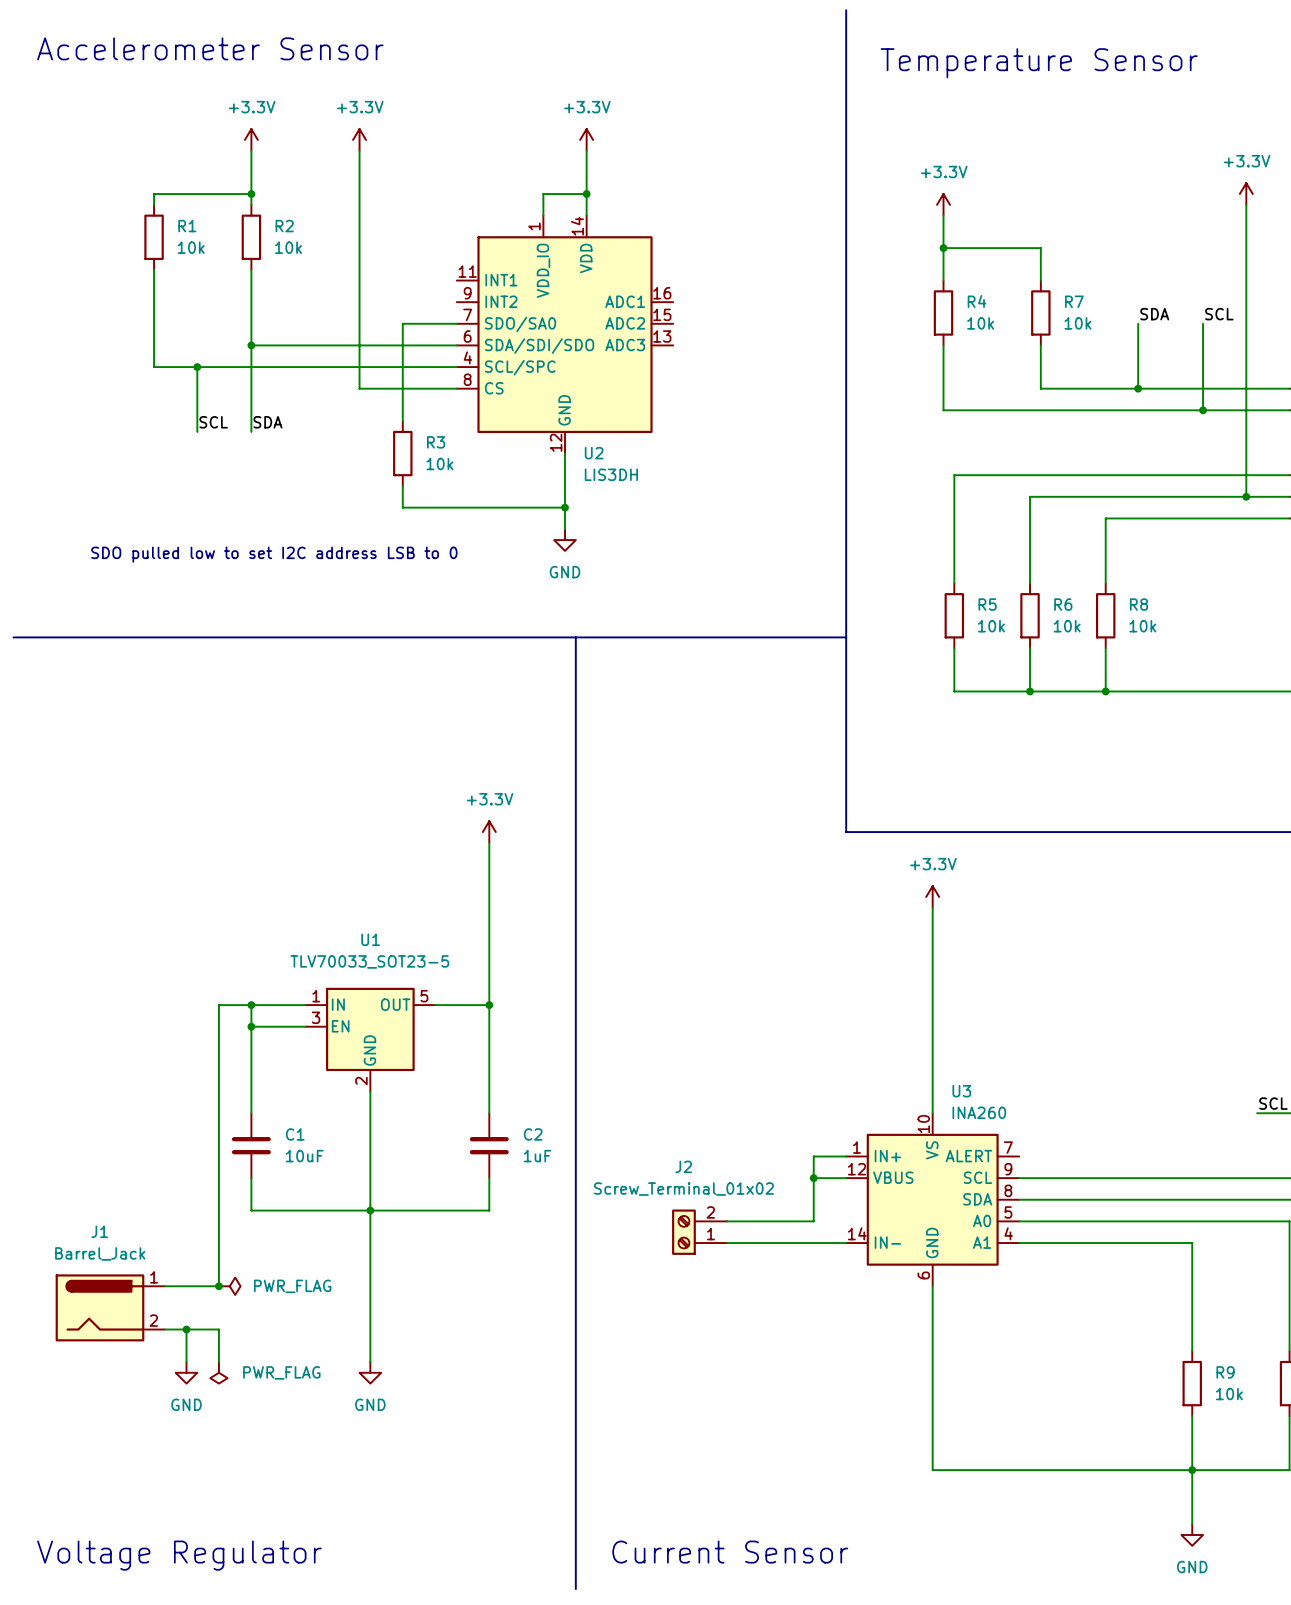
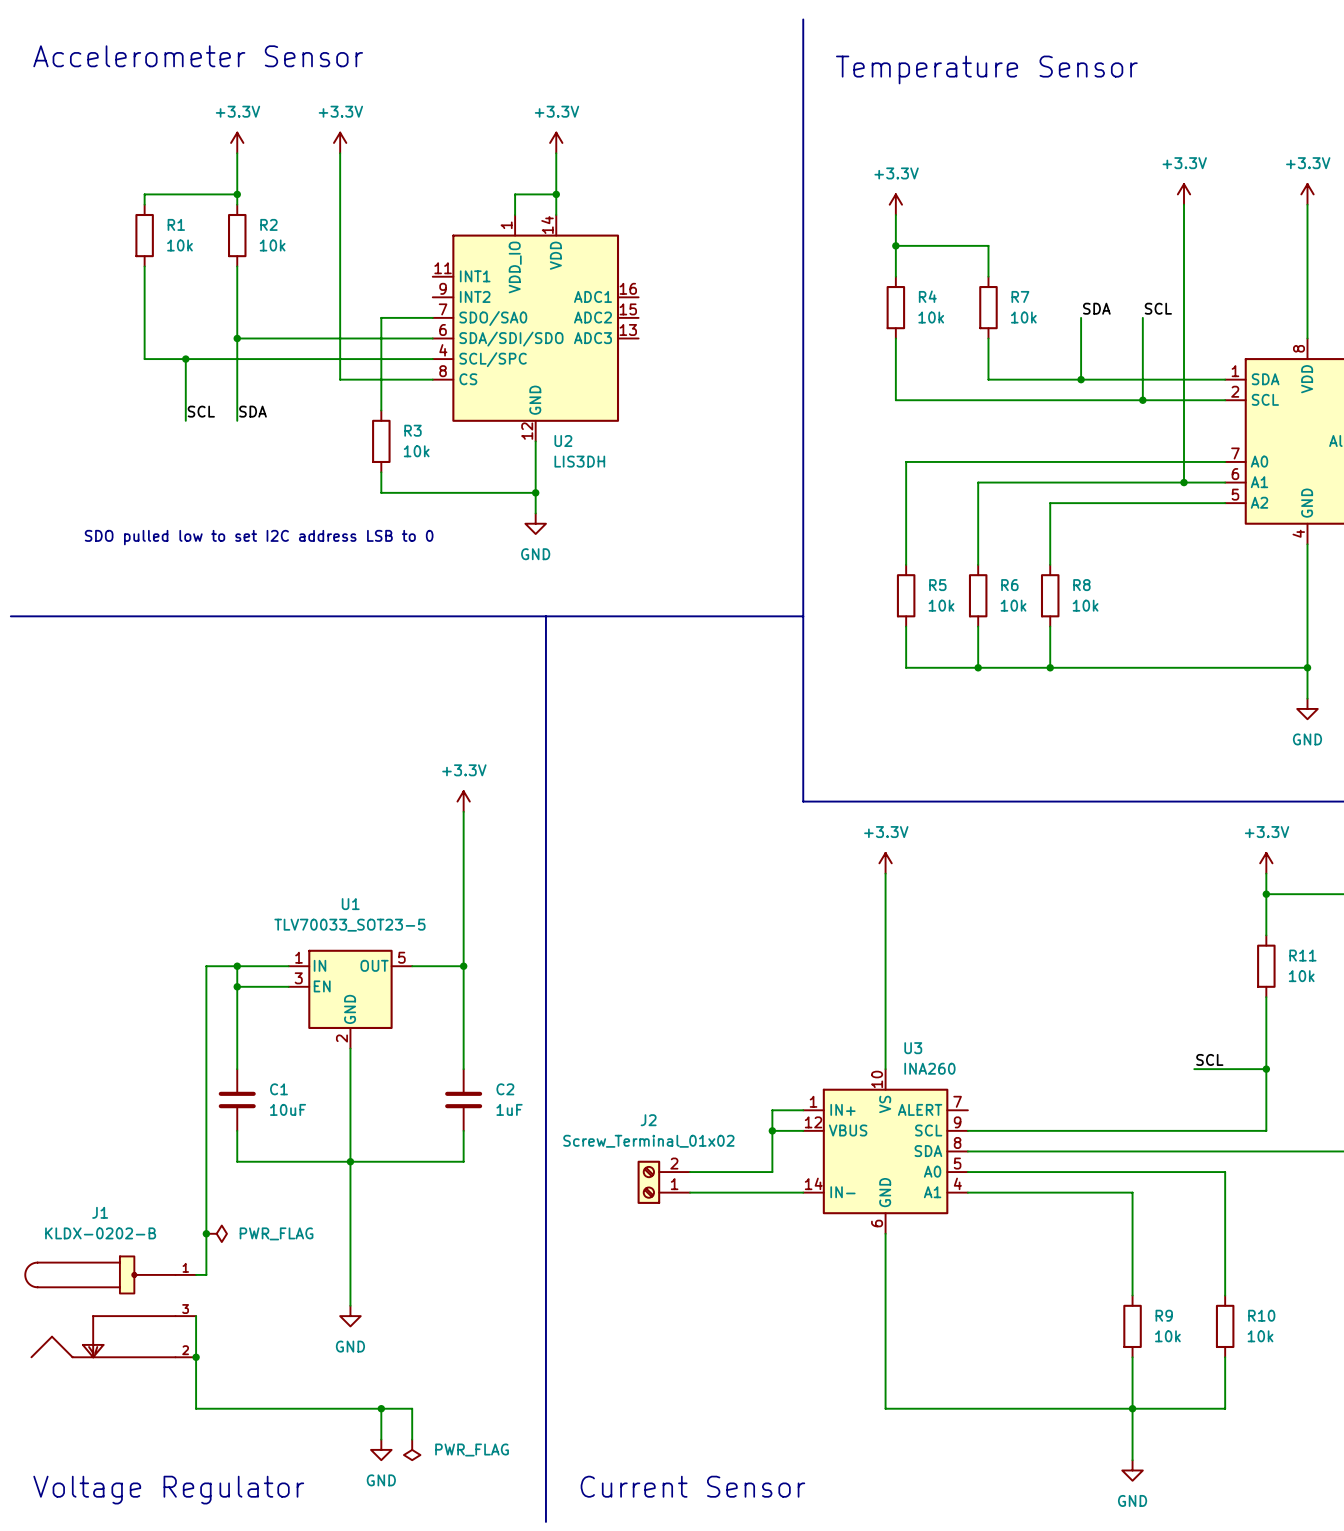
J1 name position: J1 (99, 1231) -> J1 (100, 1212)
J1 value: Barrel_Jack (100, 1253) -> KLDX-0202-B (100, 1233)
J1 symbol: [55, 1274, 165, 1342] -> [25, 1256, 197, 1358]
wire: (164, 1286) (218, 1286) -> (206, 1274) (206, 1233)
wire: (186, 1329) (186, 1361) -> none
junction: (186, 1329) -> none
wire: (218, 1329) (218, 1361) -> none
power symbol: GND (186, 1372) -> none
wire: none -> (196, 1316) (196, 1408) (412, 1408) (412, 1439)
power symbol: PWR_FLAG (218, 1372) -> none
junction: none -> (196, 1357)
wire: none -> (381, 1408) (381, 1439)
junction: none -> (381, 1408)
power symbol: none -> GND (381, 1449)
power symbol: none -> PWR_FLAG (412, 1449)

